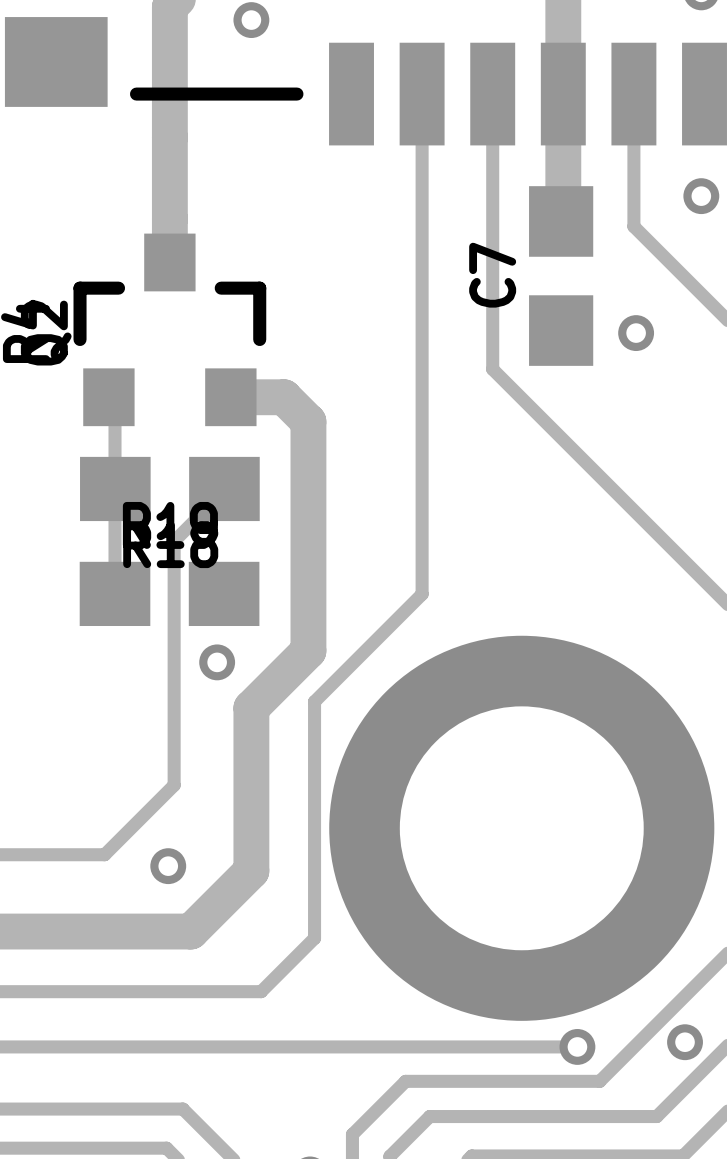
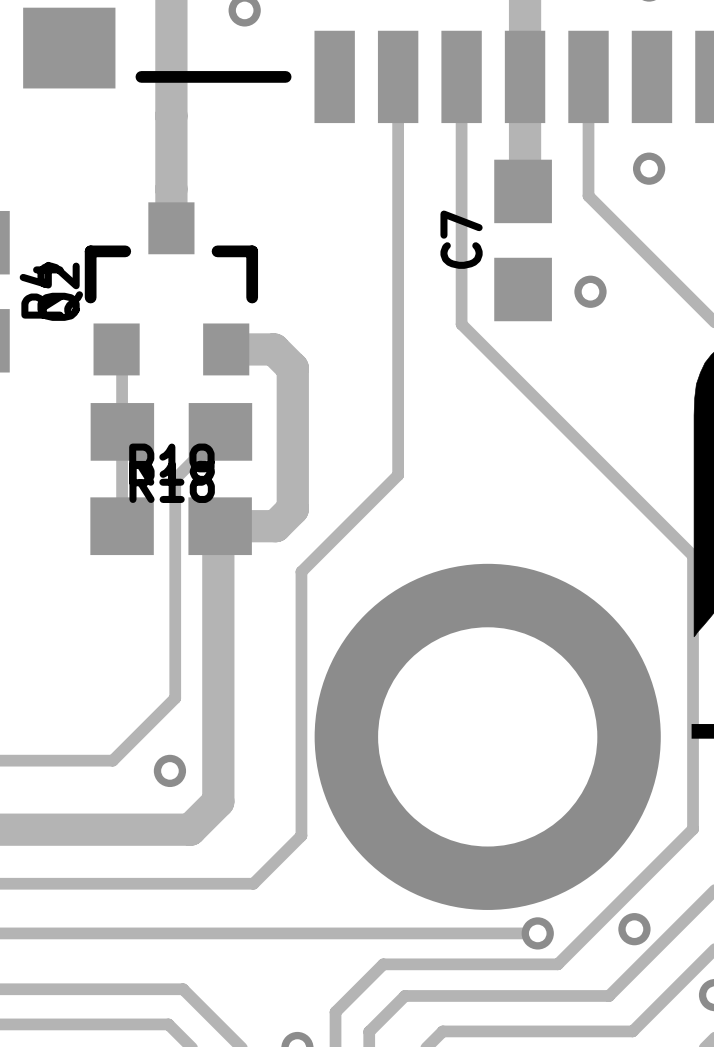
track: (304, 418) (308, 421) (308, 650) (251, 708) (251, 871) (222, 900) -> (292, 368) (292, 509) (275, 526) (220, 526) (218, 528) (218, 801)
track: (422, 537) (422, 594) (314, 701) -> (398, 475) (301, 571) (301, 623)
via: (217, 662) -> none

